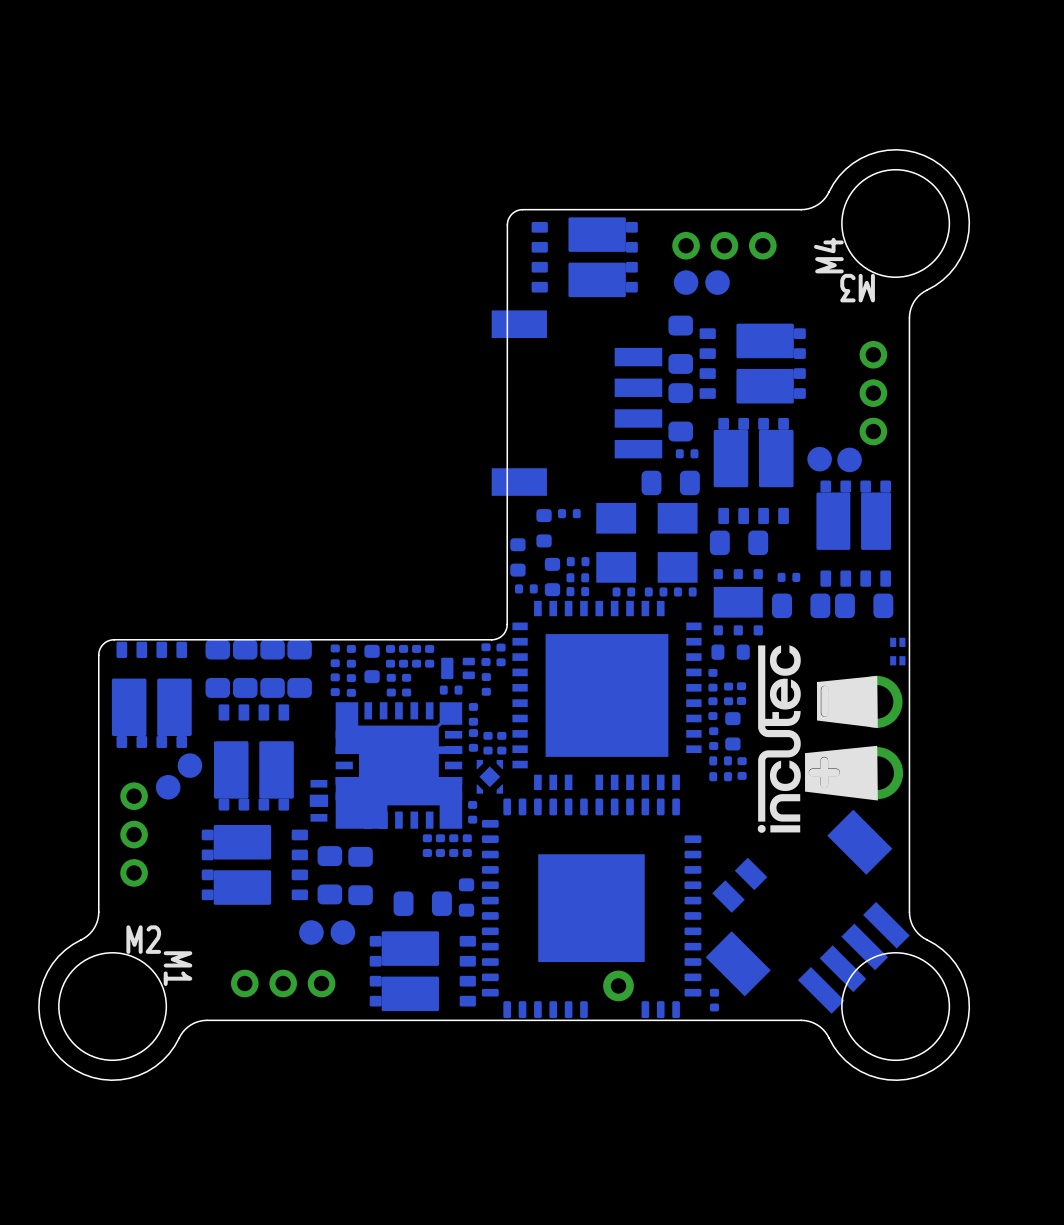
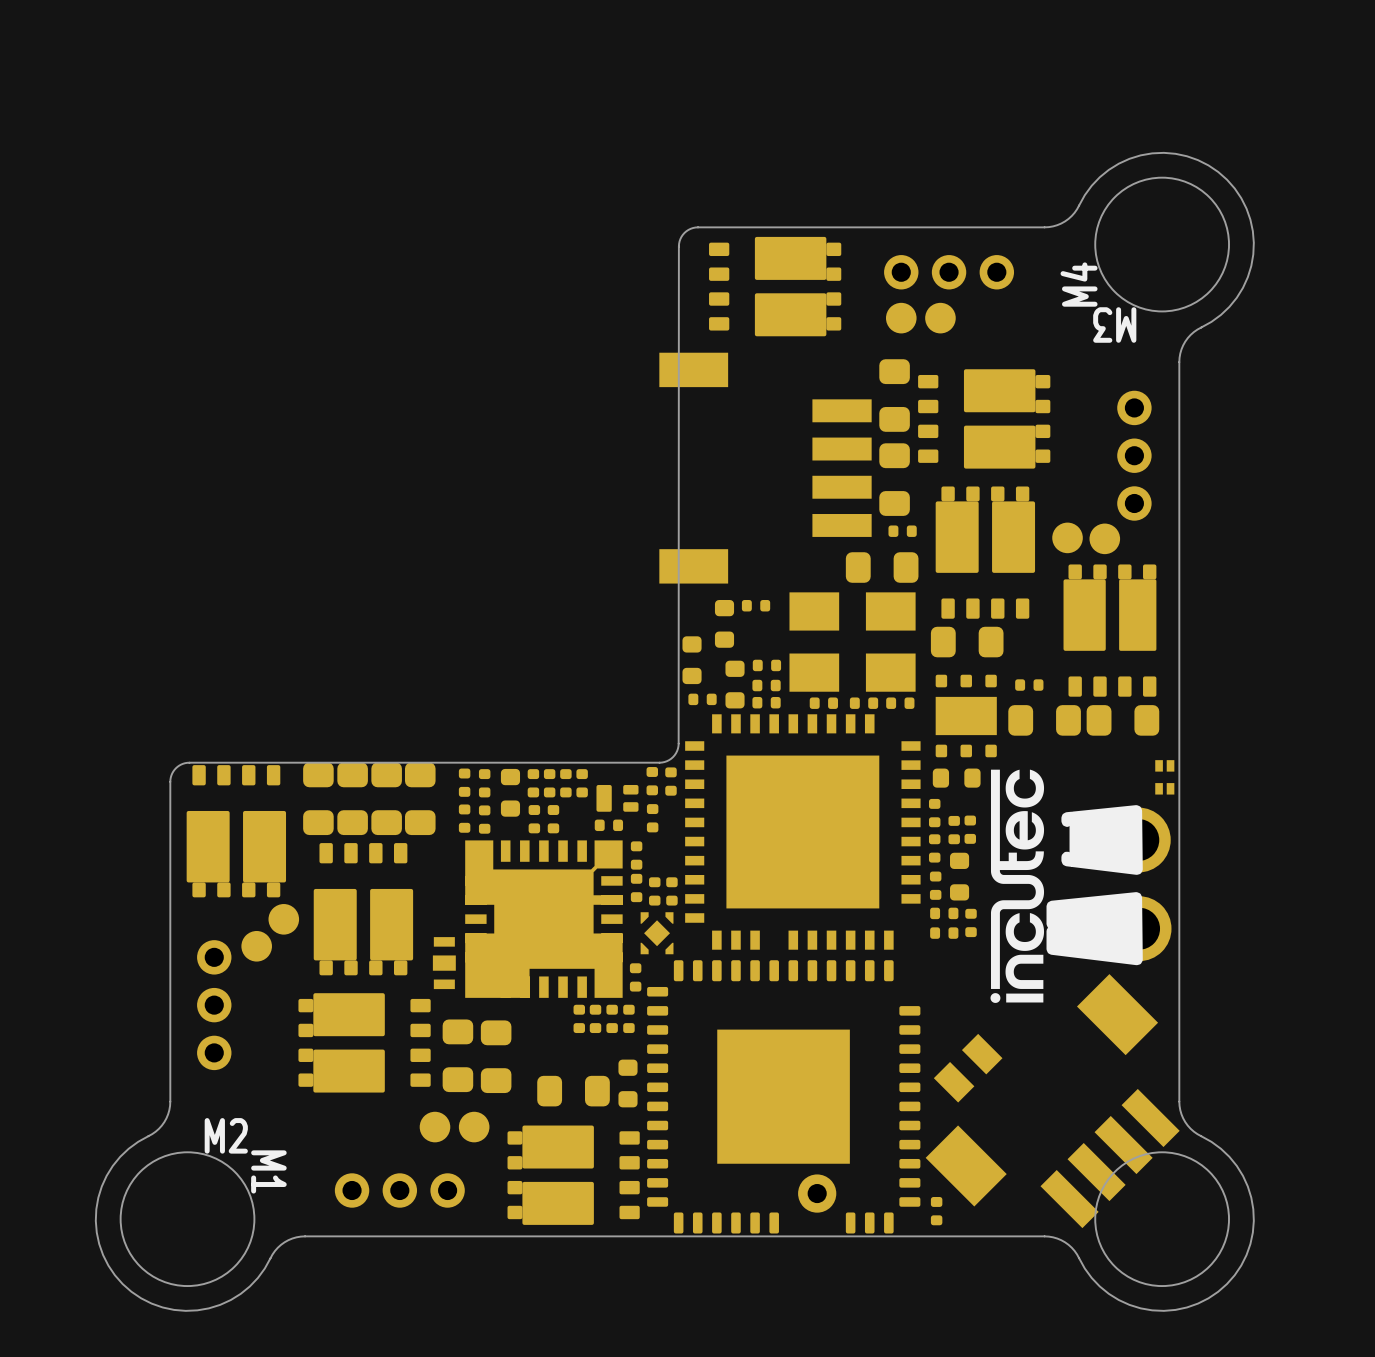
drawing shape: [816, 675, 878, 728] -> [1061, 805, 1143, 875]
drawing shape: [805, 745, 878, 801] -> [1046, 892, 1143, 966]

